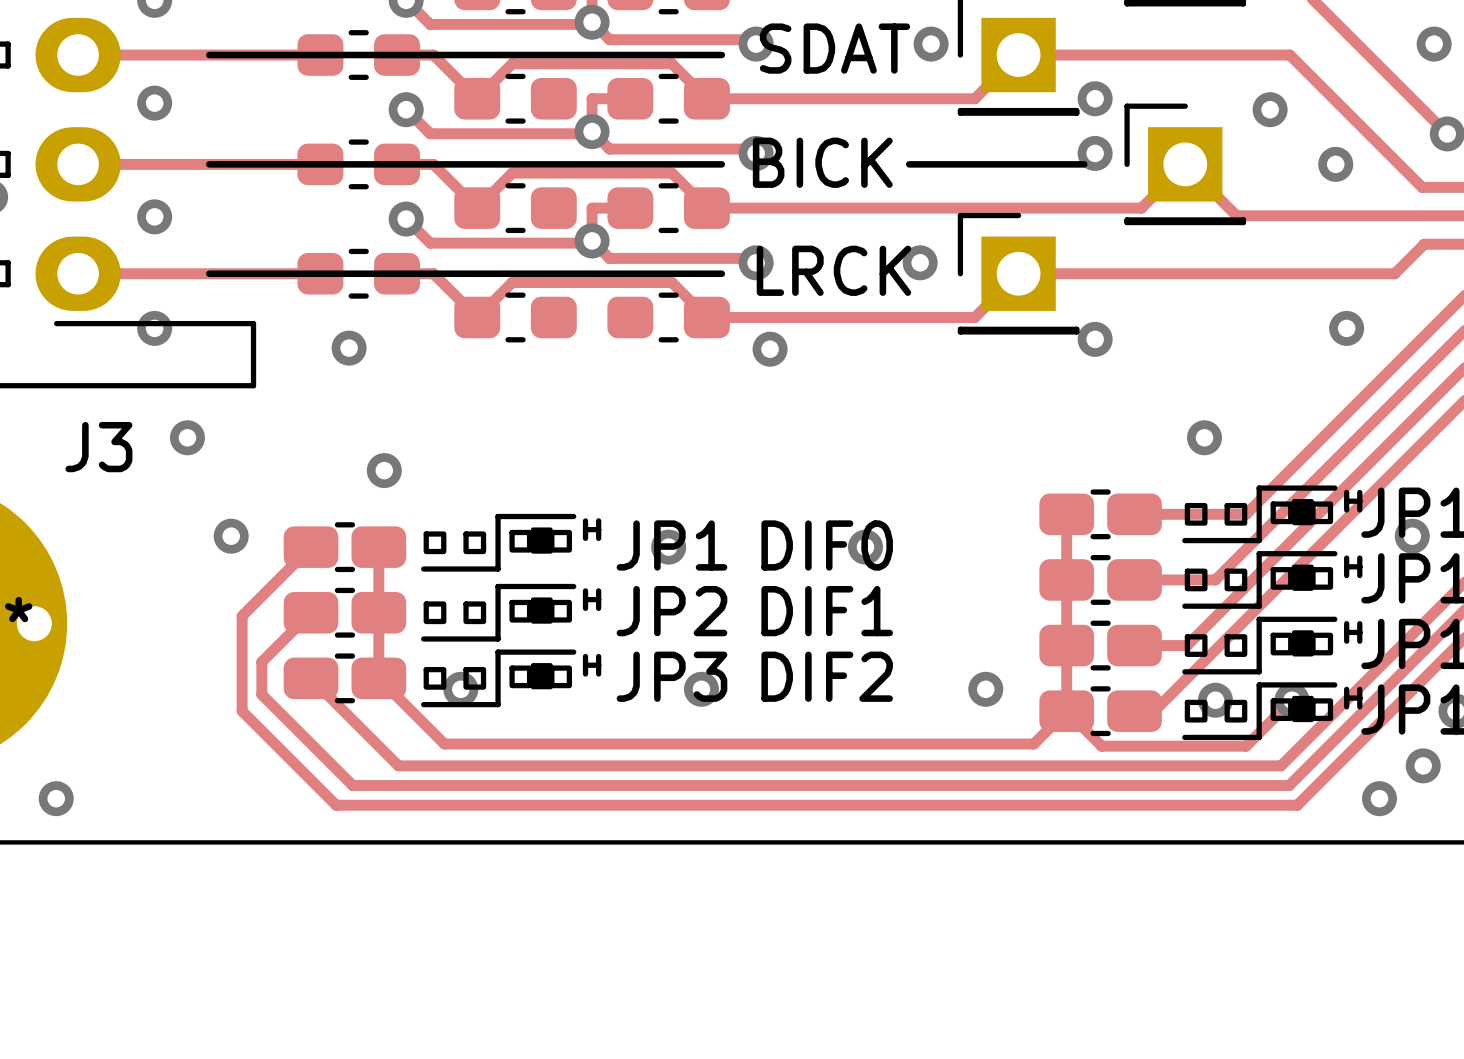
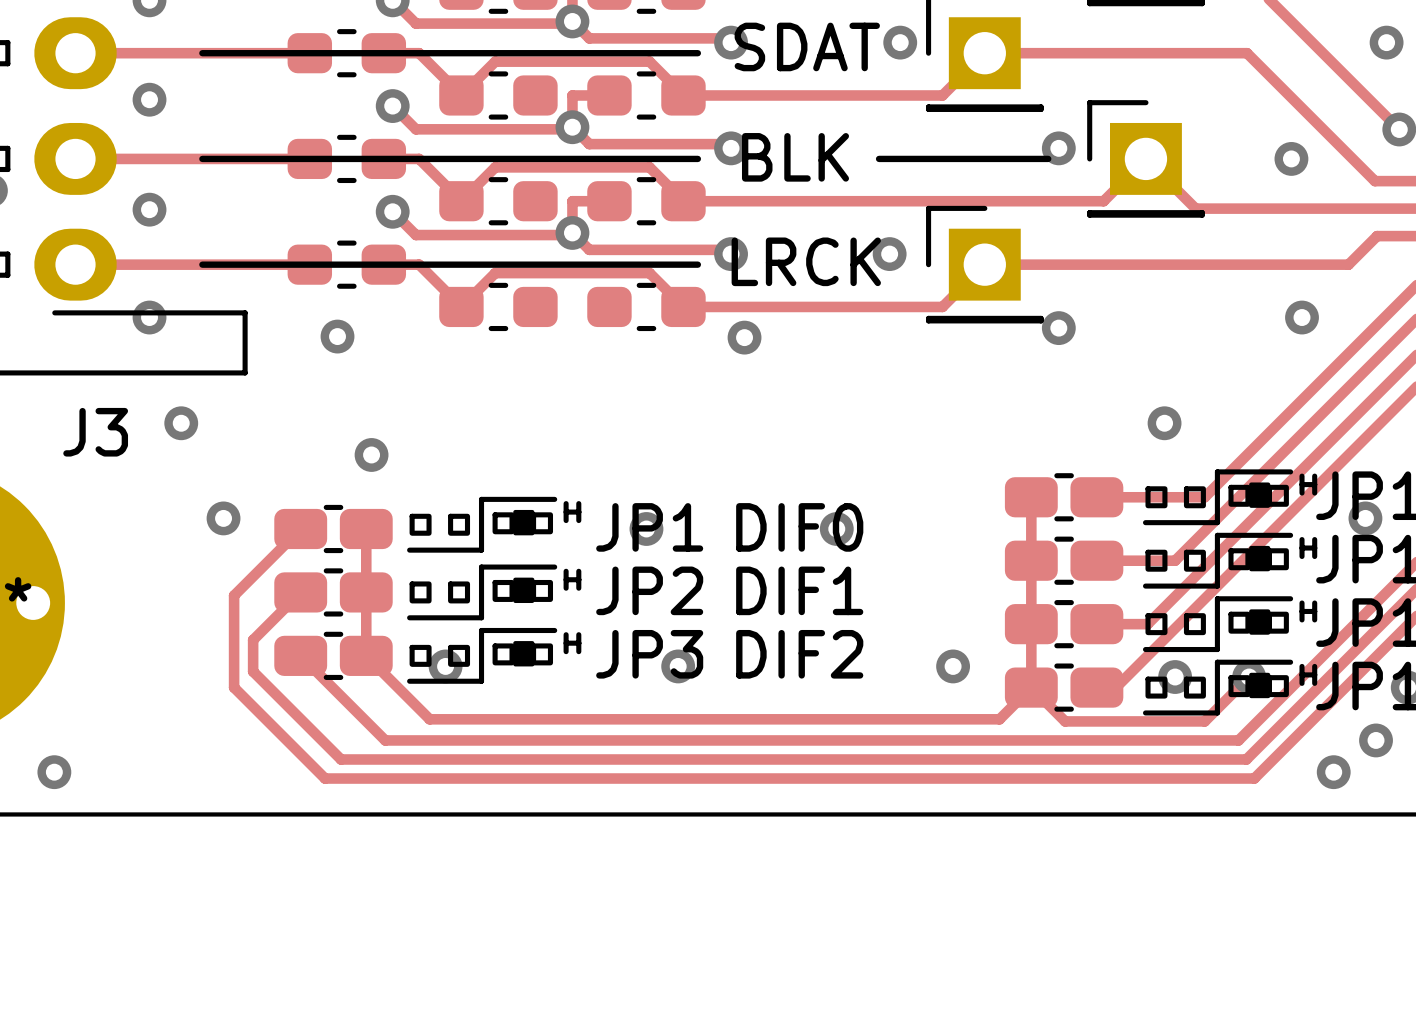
via: (1095, 98) -> none
via: (1270, 109) -> none
text: BICK (822, 162) -> BLK (795, 157)

